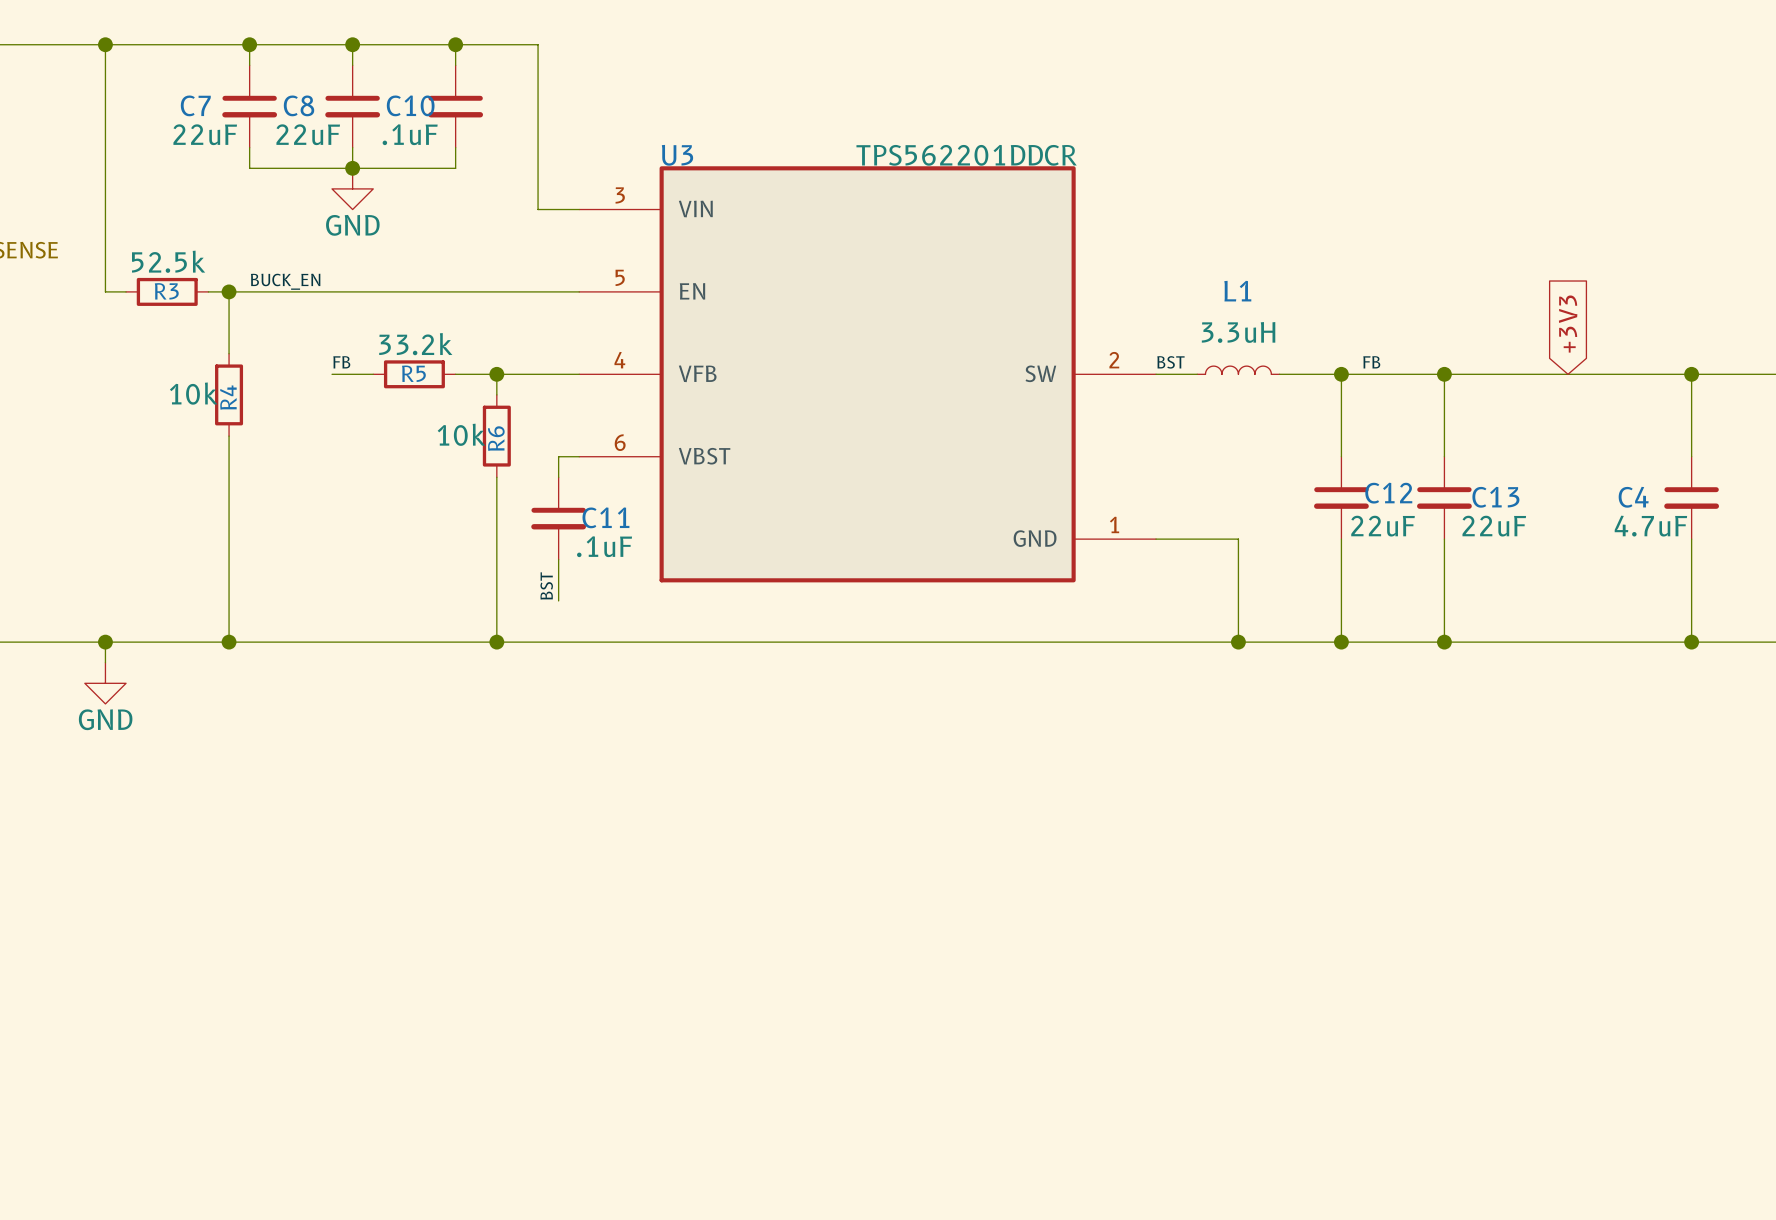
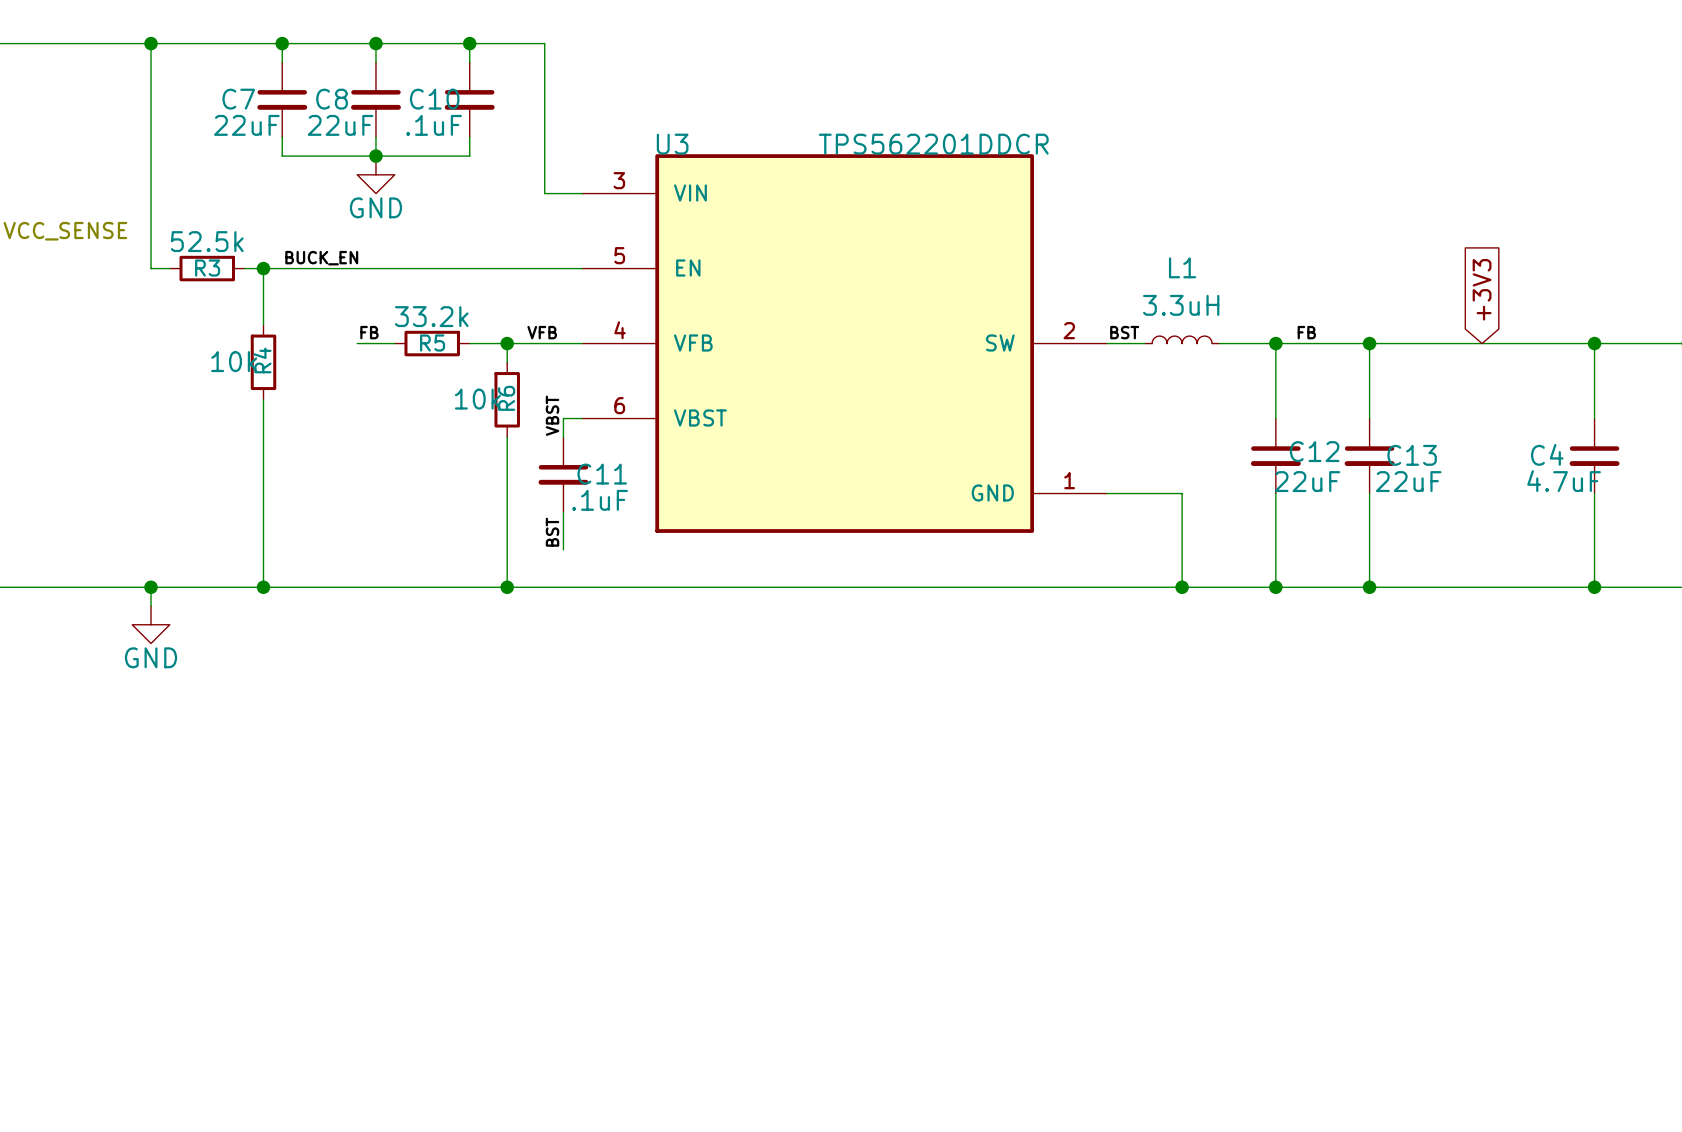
label: none -> VFB (542, 332)
label: none -> VBST (552, 415)

